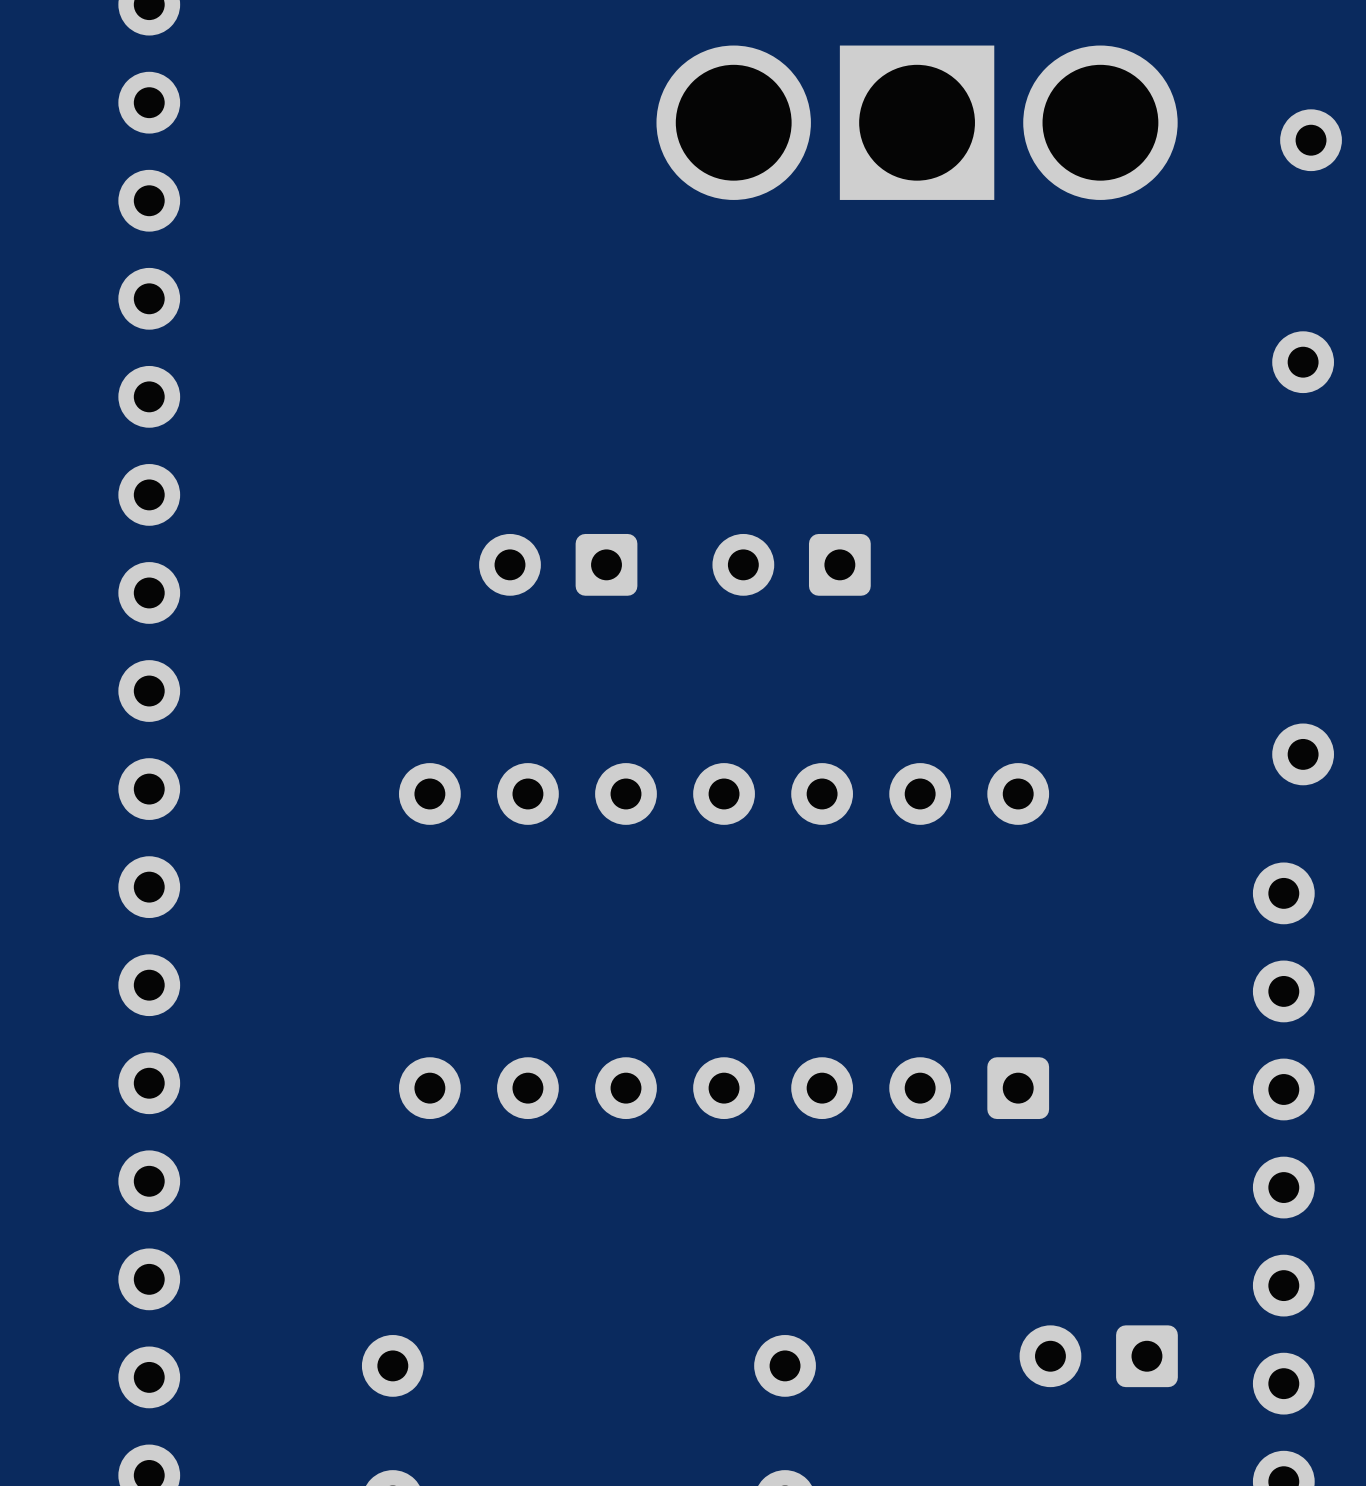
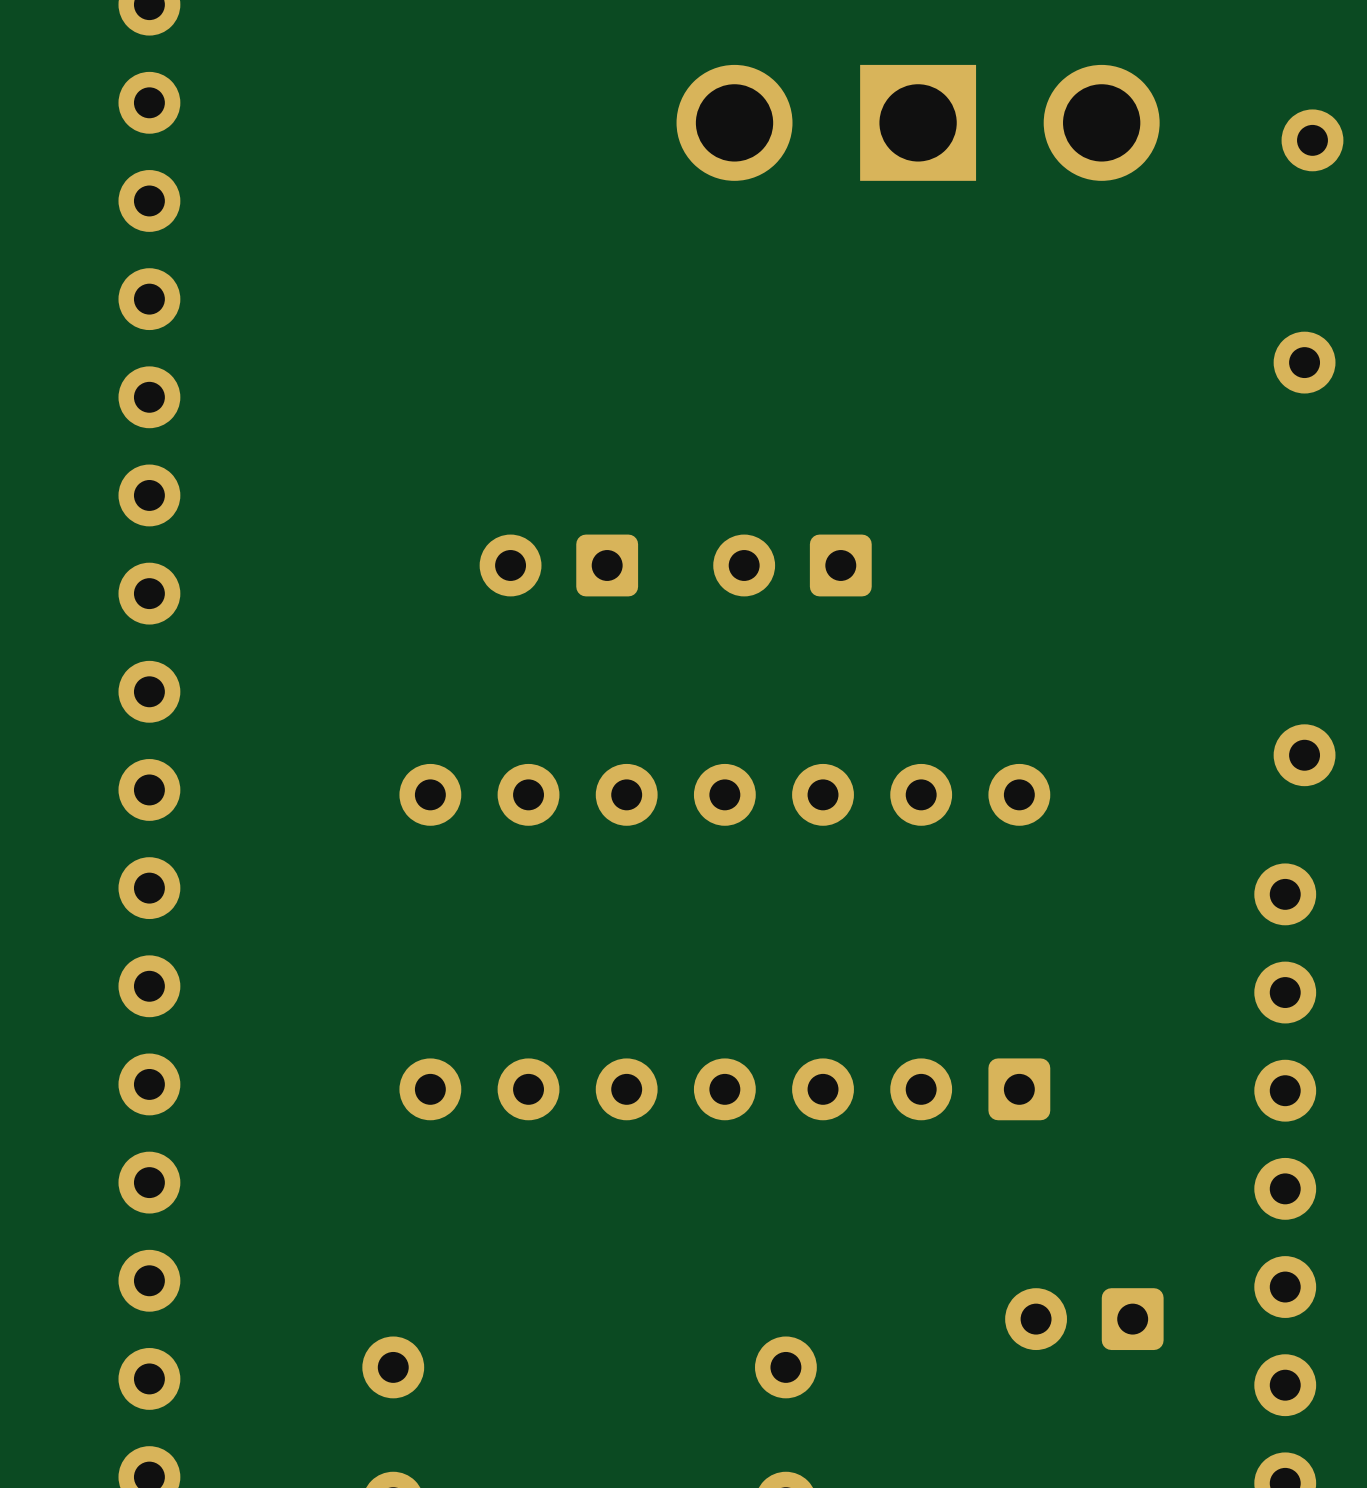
part footprint: [656, 45, 1178, 200] -> [676, 64, 1160, 181]
part position: (1098, 1356) -> (1084, 1319)

